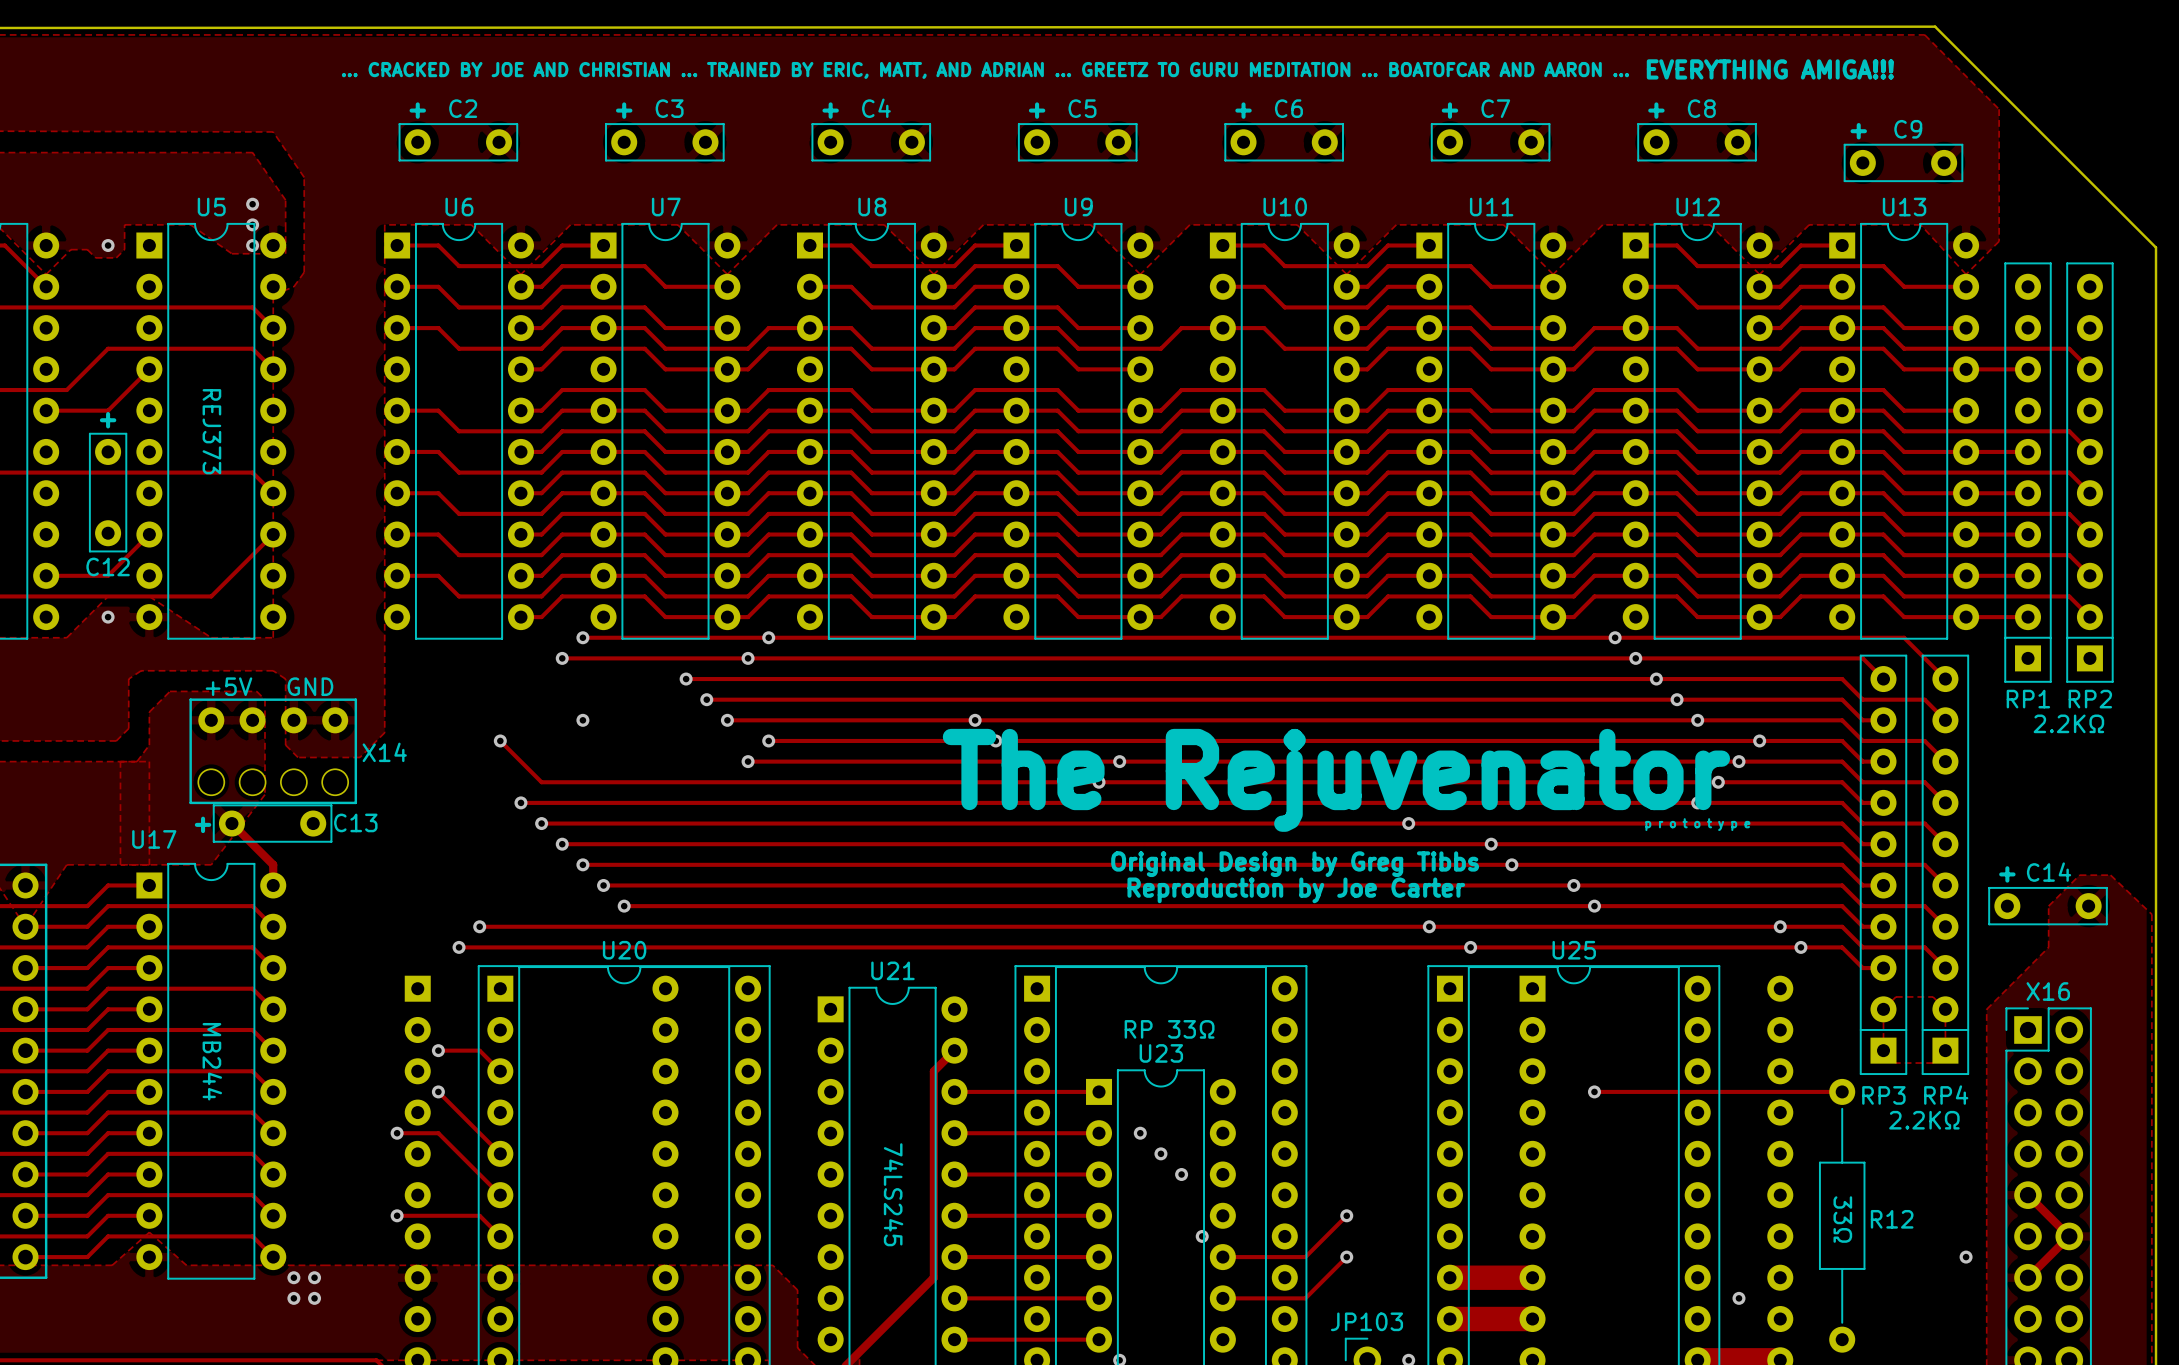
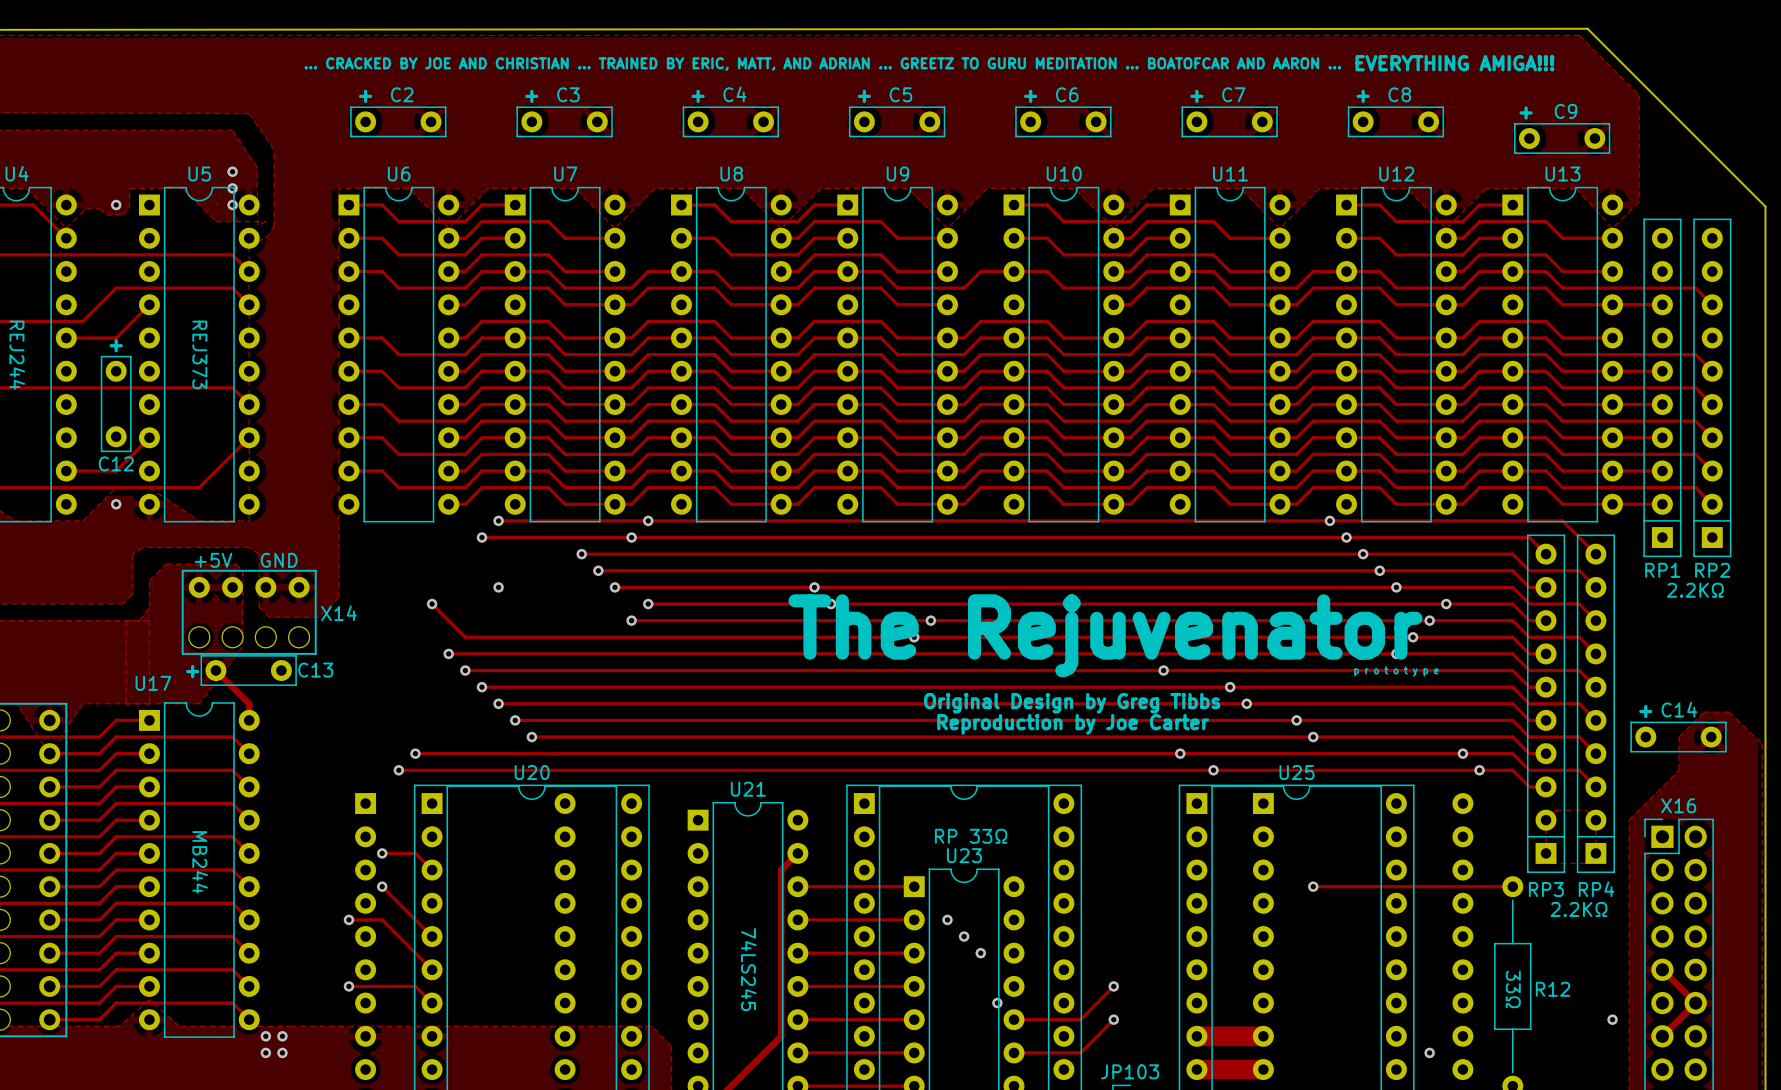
zone outline: (252, 152) (285, 200) (285, 253) (231, 253) (190, 224) -> (232, 130) (257, 167) (257, 225) (265, 221) (215, 221) (182, 188)

